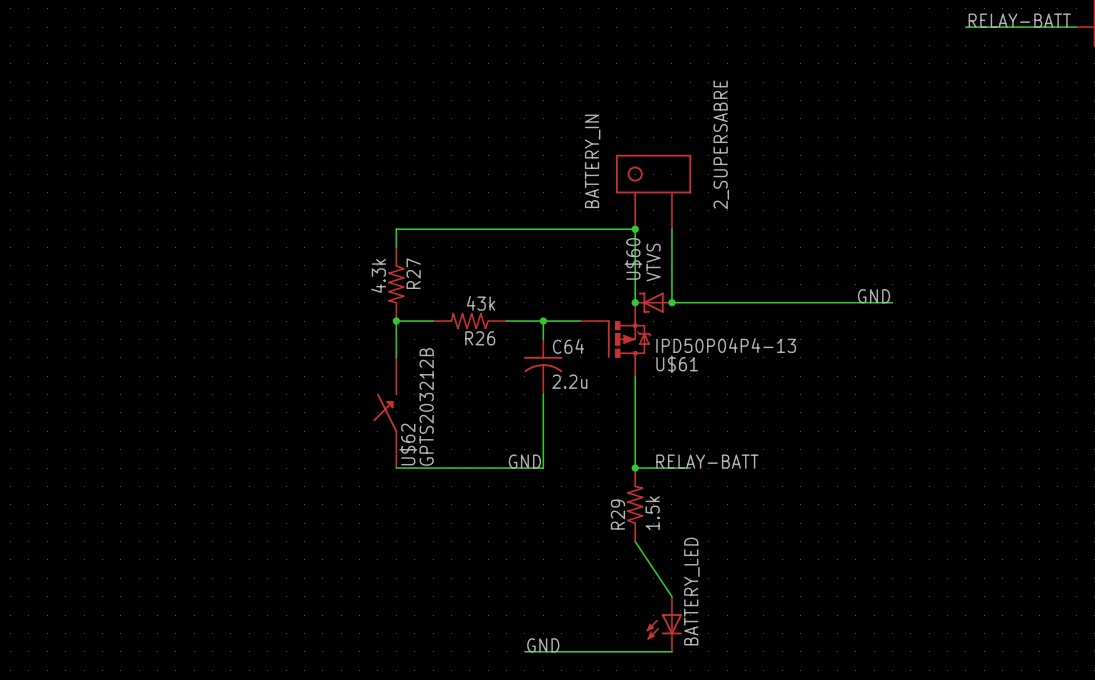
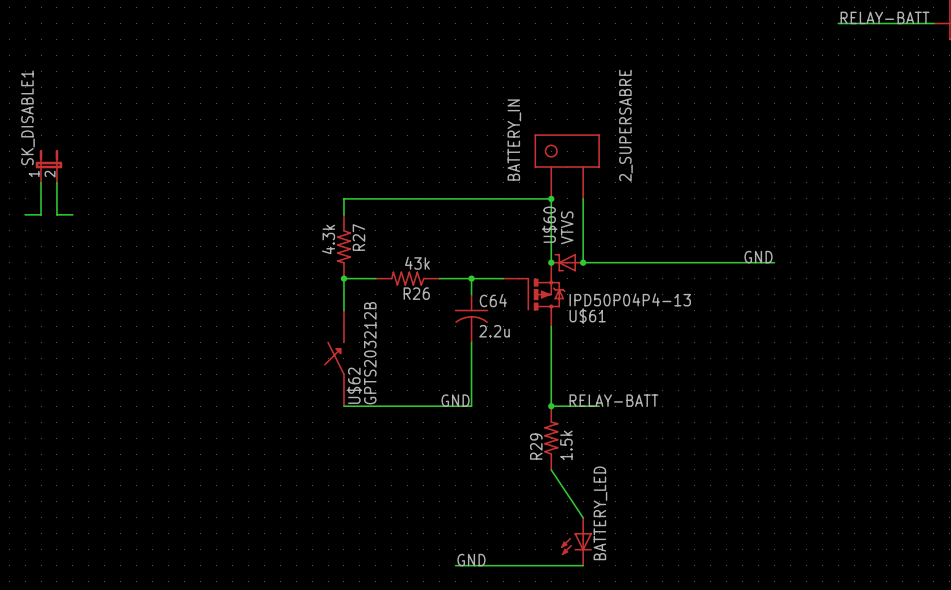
SK_DISABLE1: none -> (48, 166)
wire: none -> (41, 182) (41, 214) (25, 214)
wire: none -> (56, 182) (56, 214) (72, 214)

